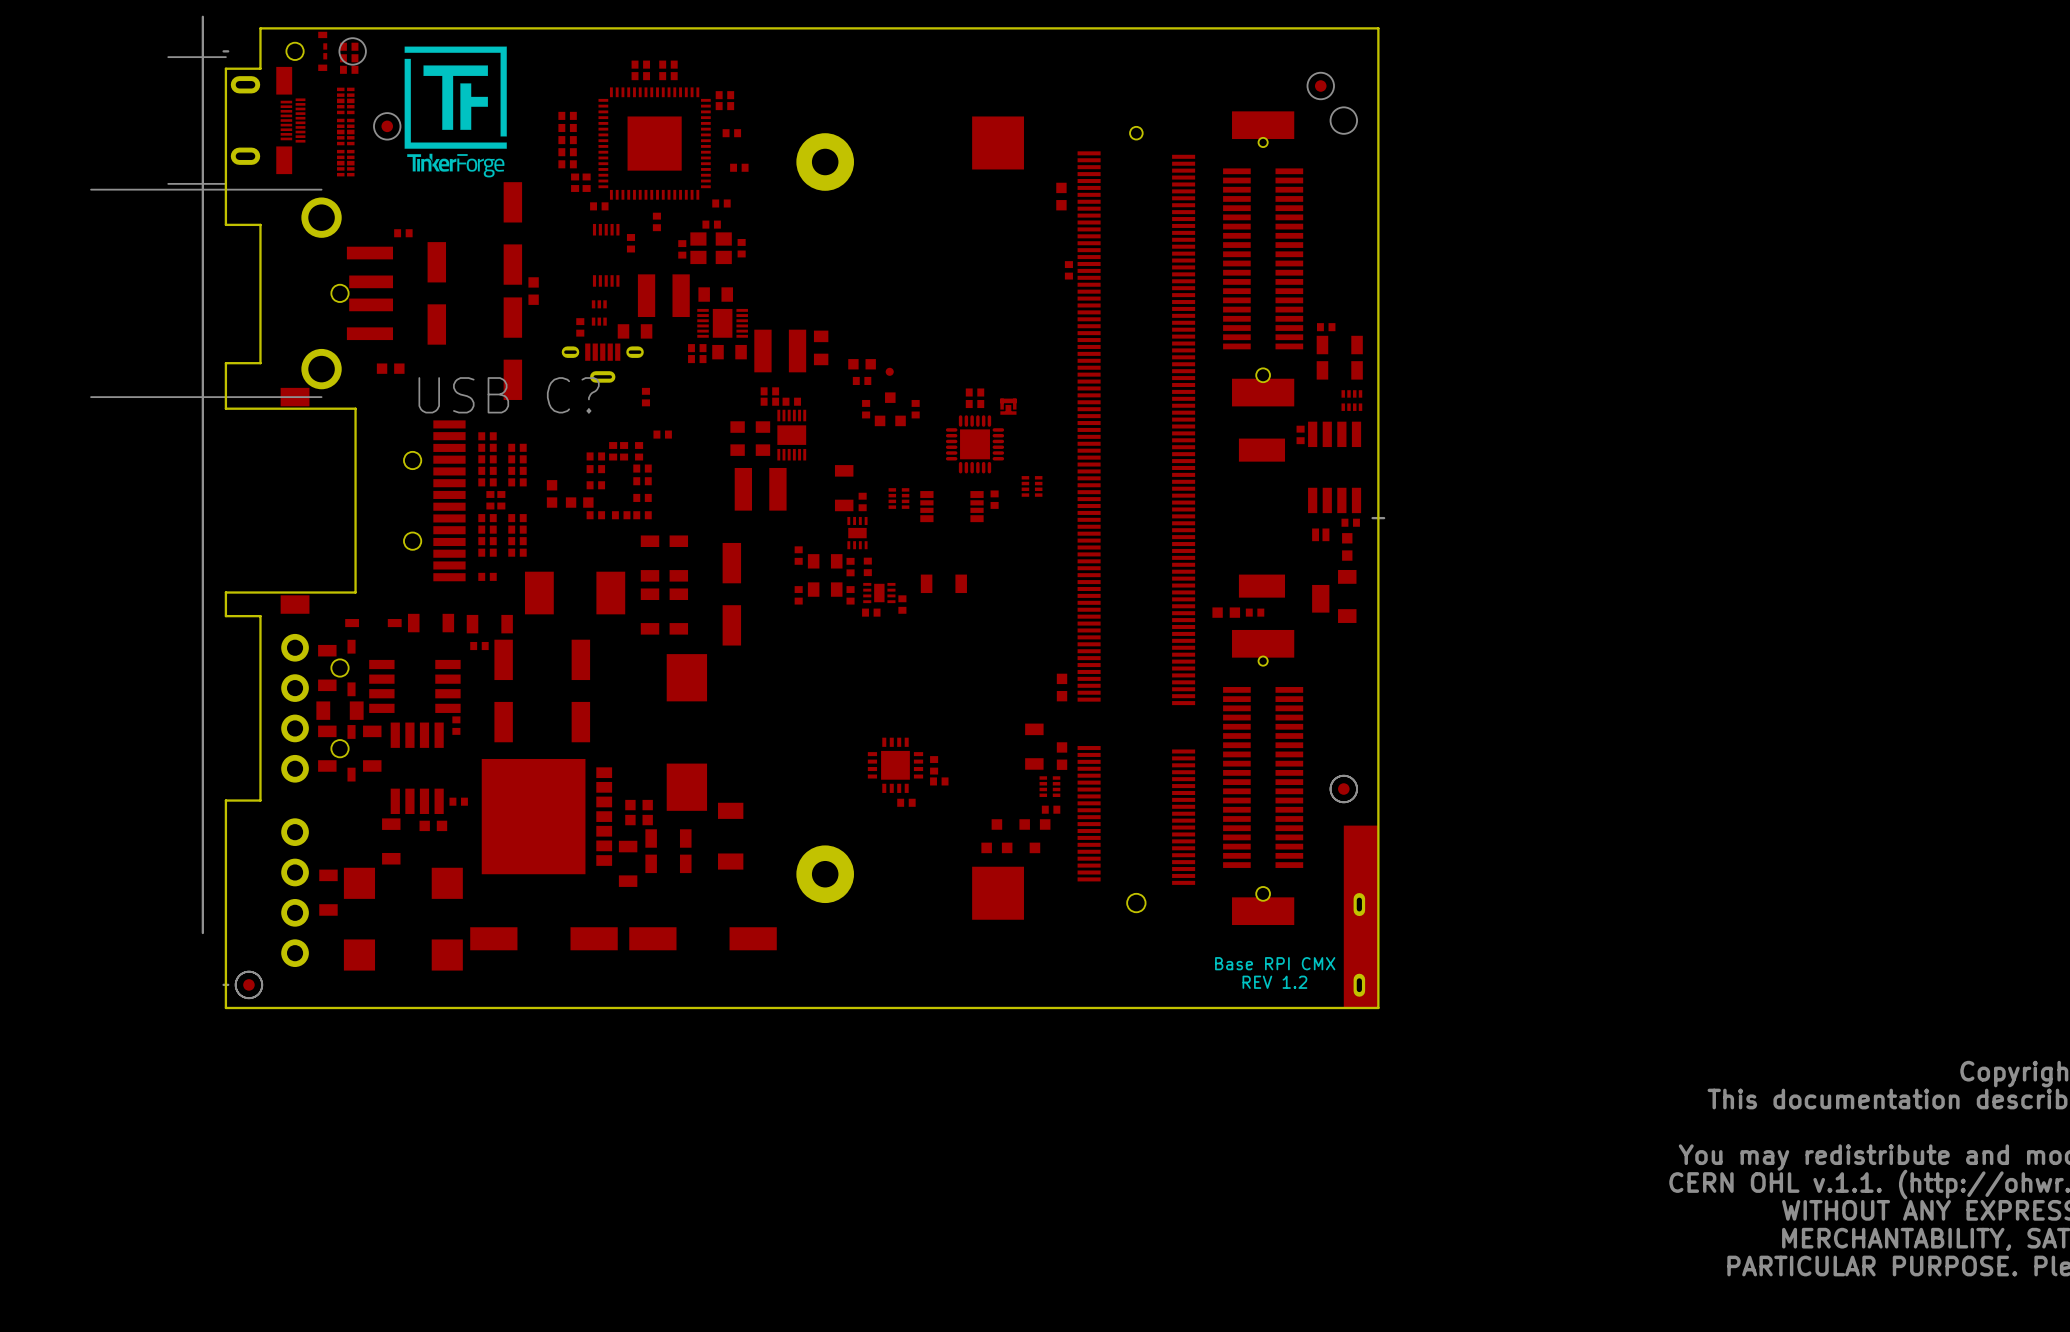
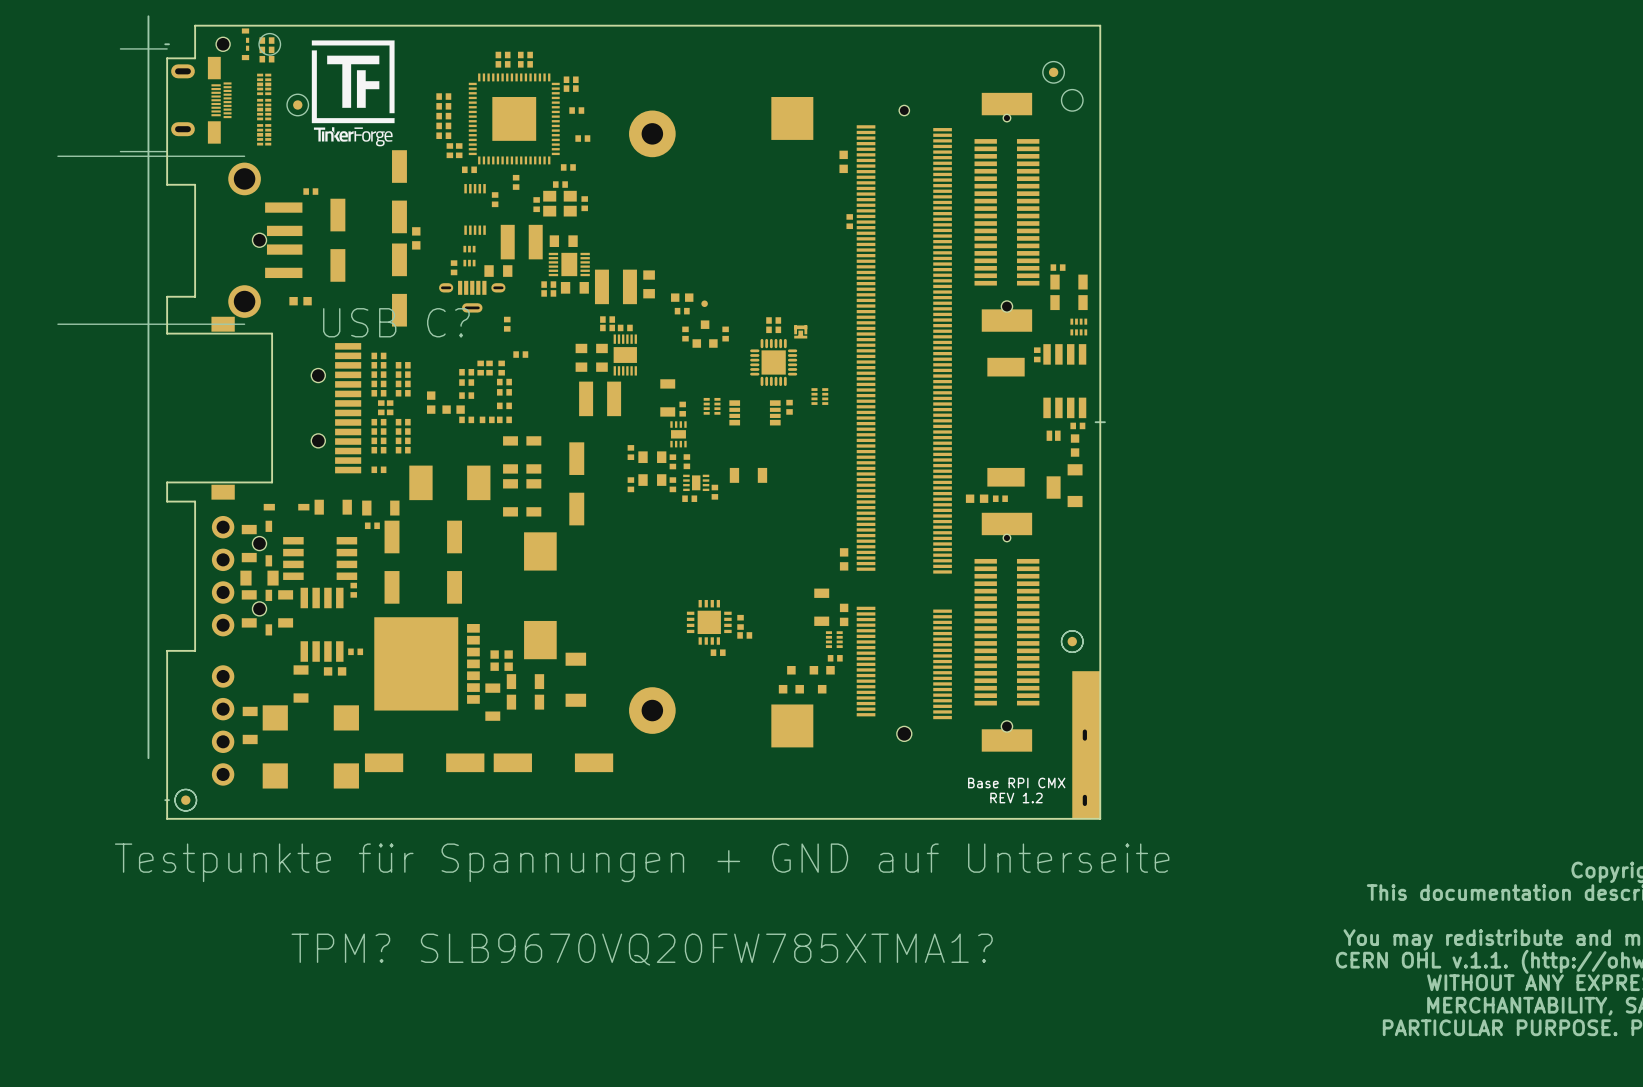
text: none -> Testpunkte für Spannungen + GND auf Unterseite (642, 862)
text: none -> TPM? SLB9670VQ20FW785XTMA1? (642, 949)

